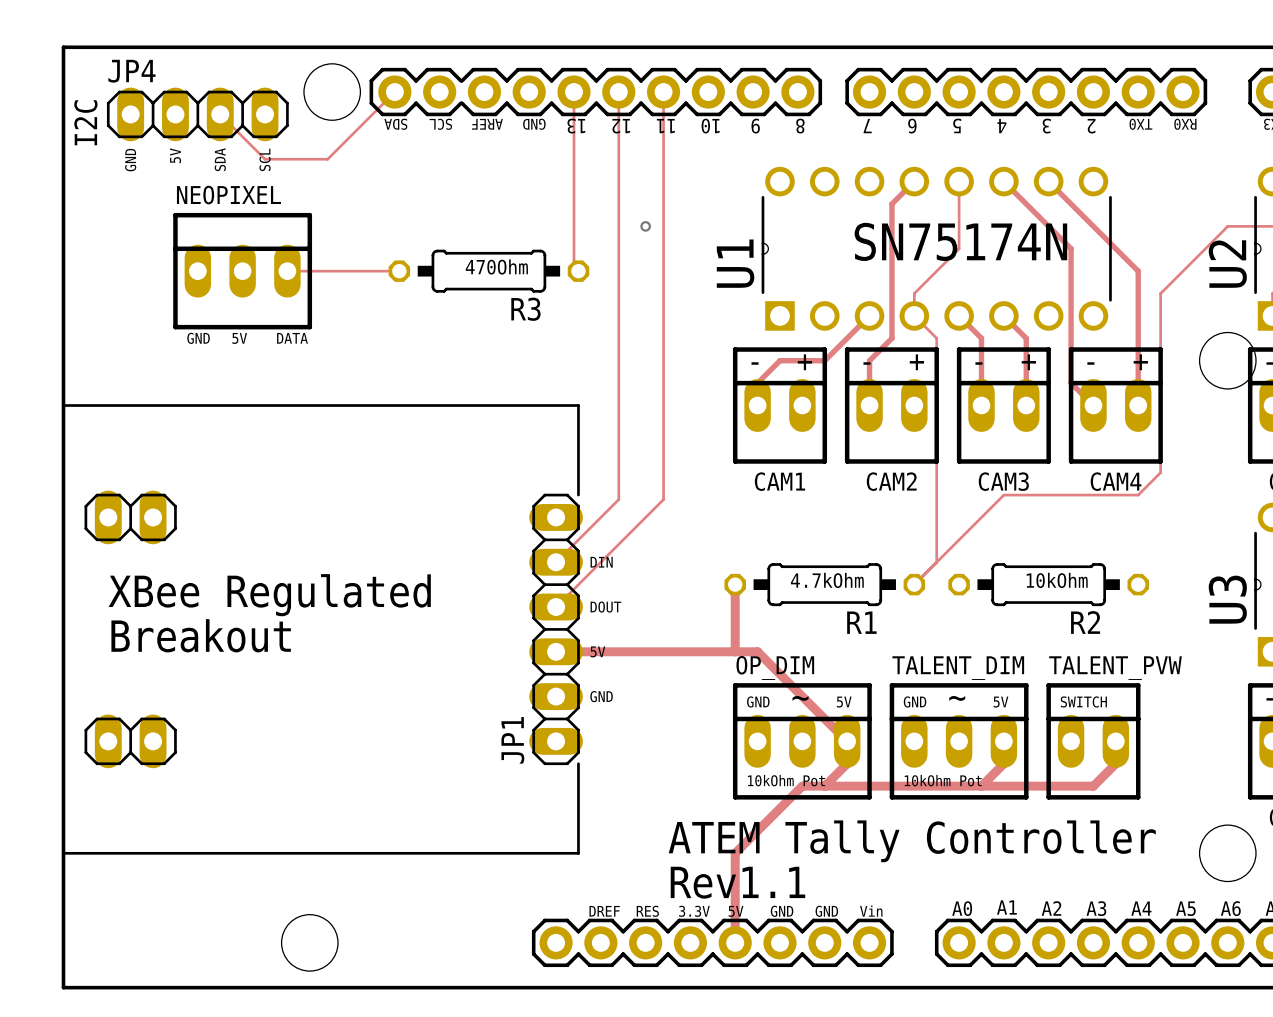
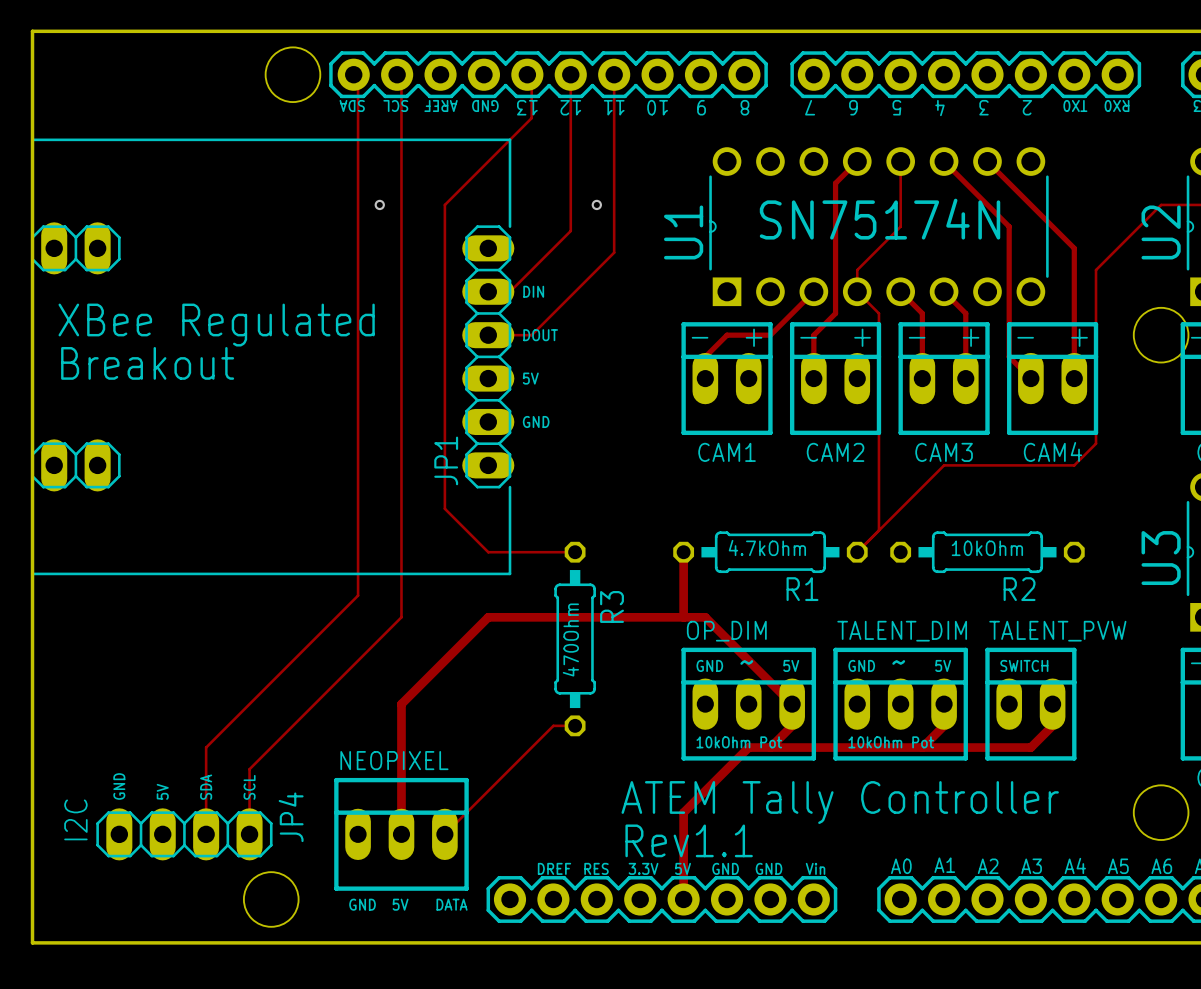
JP4 name rotation: 0° (131, 71) -> 90° counterclockwise (291, 817)
JP4 name position: JP4 (131, 71) -> JP4 (291, 817)
track: (394, 92) (327, 159) (265, 159) (220, 114) -> (353, 74) (358, 79) (358, 595) (206, 747) (206, 834)
track: none -> (397, 74) (401, 79) (401, 617) (249, 769) (249, 834)
track: (574, 92) (574, 266) (578, 271) -> (527, 74) (531, 79) (531, 118) (444, 204) (444, 508) (488, 552) (575, 552)
JP4 position: (197, 114) -> (184, 834)
JP4 value position: I2C (85, 122) -> I2C (75, 819)
text: 5V (175, 155) -> none
line: none -> (32, 139) (510, 139) (510, 226)
text: SDA (220, 159) -> none
text: SCL (265, 159) -> none
text: GND (130, 160) -> none
via: none -> (379, 204)
track: (618, 253) (618, 499) (556, 562) -> (570, 230) (510, 291) (488, 291)
part: none -> (75, 248)
NEOPIXEL: (242, 271) -> none
track: (287, 271) (399, 271) -> none
R3 rotation: 0° (488, 271) -> 90° clockwise (575, 639)
R3 position: (488, 271) -> (575, 639)
track: (663, 275) (663, 499) (556, 607) -> (614, 252) (531, 335) (488, 335)
R3 name position: R3 (525, 309) -> R3 (612, 606)
text: GND (198, 338) -> none
text: 5V (239, 338) -> none
text: DATA (292, 338) -> none
line: (63, 405) (578, 405) (578, 495) -> none
text: none -> 5V (530, 378)
text: none -> GND (536, 421)
part position: (130, 517) -> (75, 465)
line: none -> (510, 487) (510, 573) (32, 573)
text position: DIN (601, 562) -> DIN (533, 291)
text position: XBee Regulated (269, 595) -> XBee Regulated (216, 325)
text position: DOUT (605, 607) -> DOUT (540, 335)
JP1 position: (556, 629) -> (488, 356)
text position: Breakout (201, 635) -> Breakout (147, 363)
track: none -> (510, 617) (488, 617) (401, 704) (401, 834)
text: 5V (597, 651) -> none
text: GND (601, 696) -> none
part: (130, 741) -> none
line: (578, 763) (578, 853) (63, 853) -> none
track: none -> (575, 725) (553, 725) (444, 834)
text: none -> SDA (206, 787)
text: none -> SCL (249, 787)
text: none -> GND (119, 786)
text: none -> 5V (162, 791)
NEOPIXEL: none -> (401, 834)
text: none -> GND (362, 904)
text: none -> 5V (400, 904)
text: none -> DATA (452, 904)

